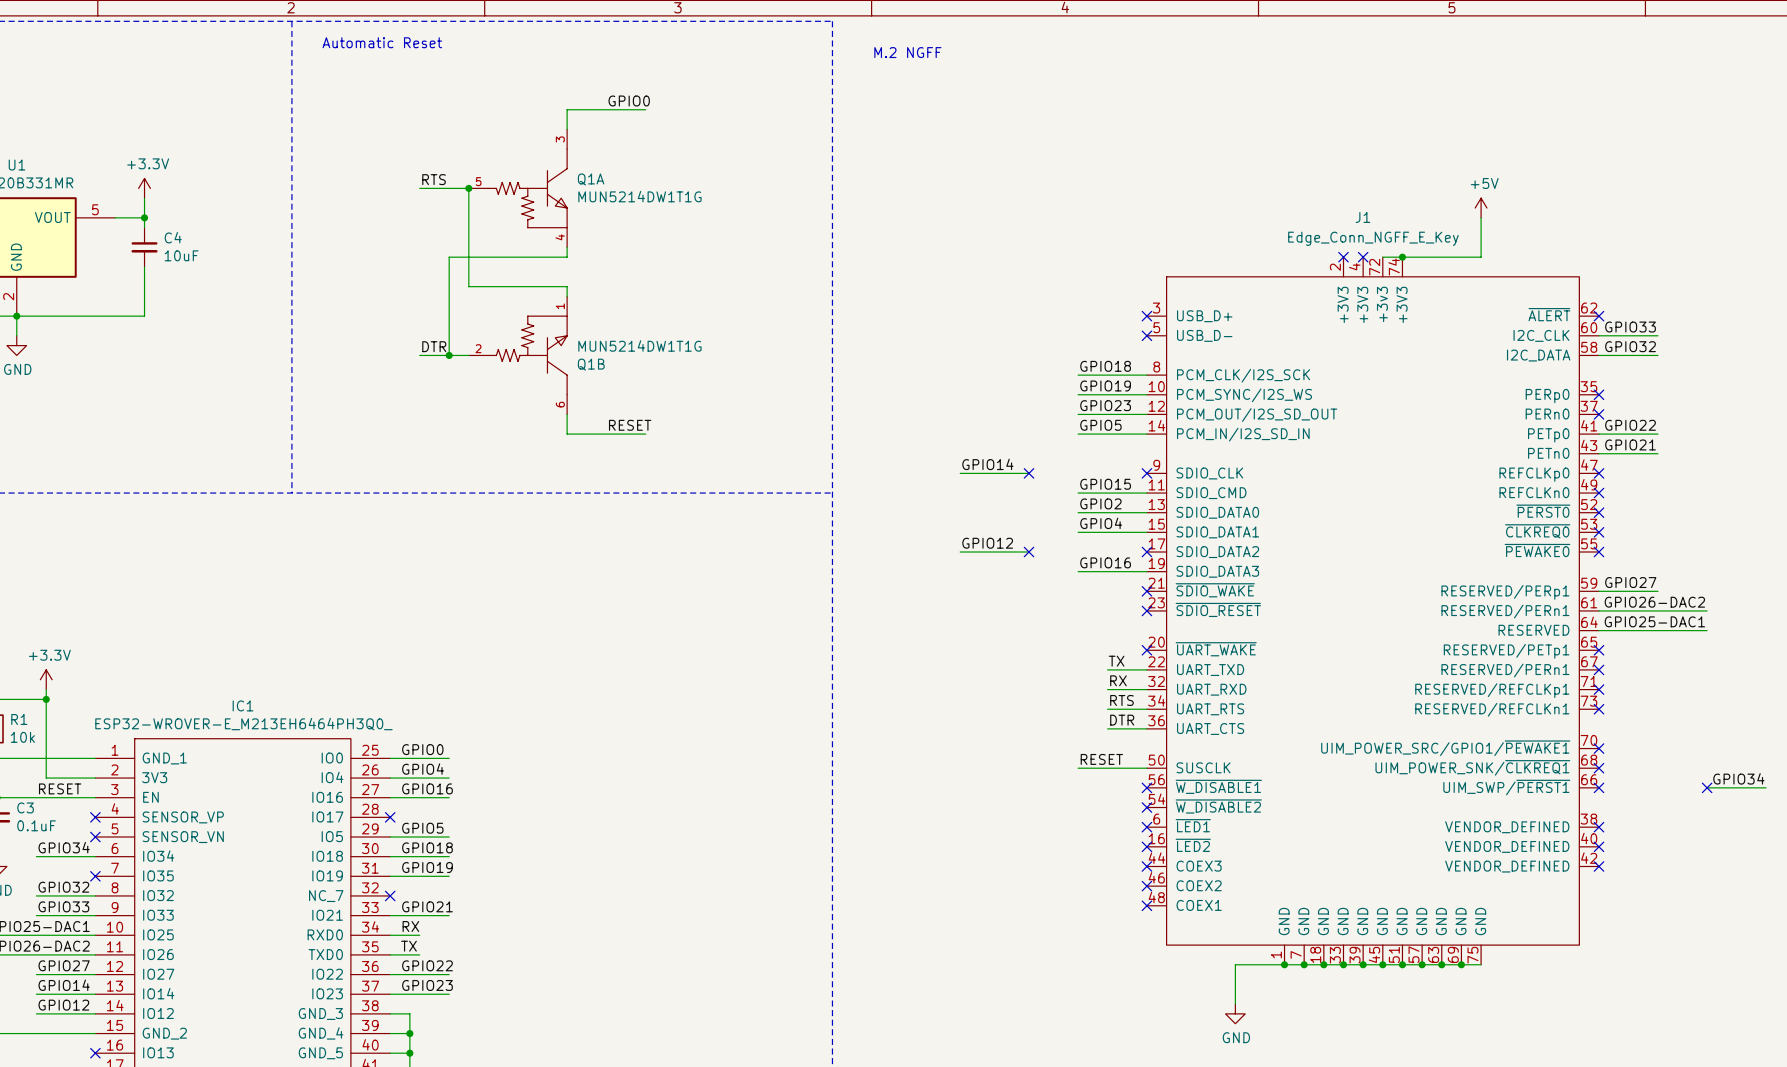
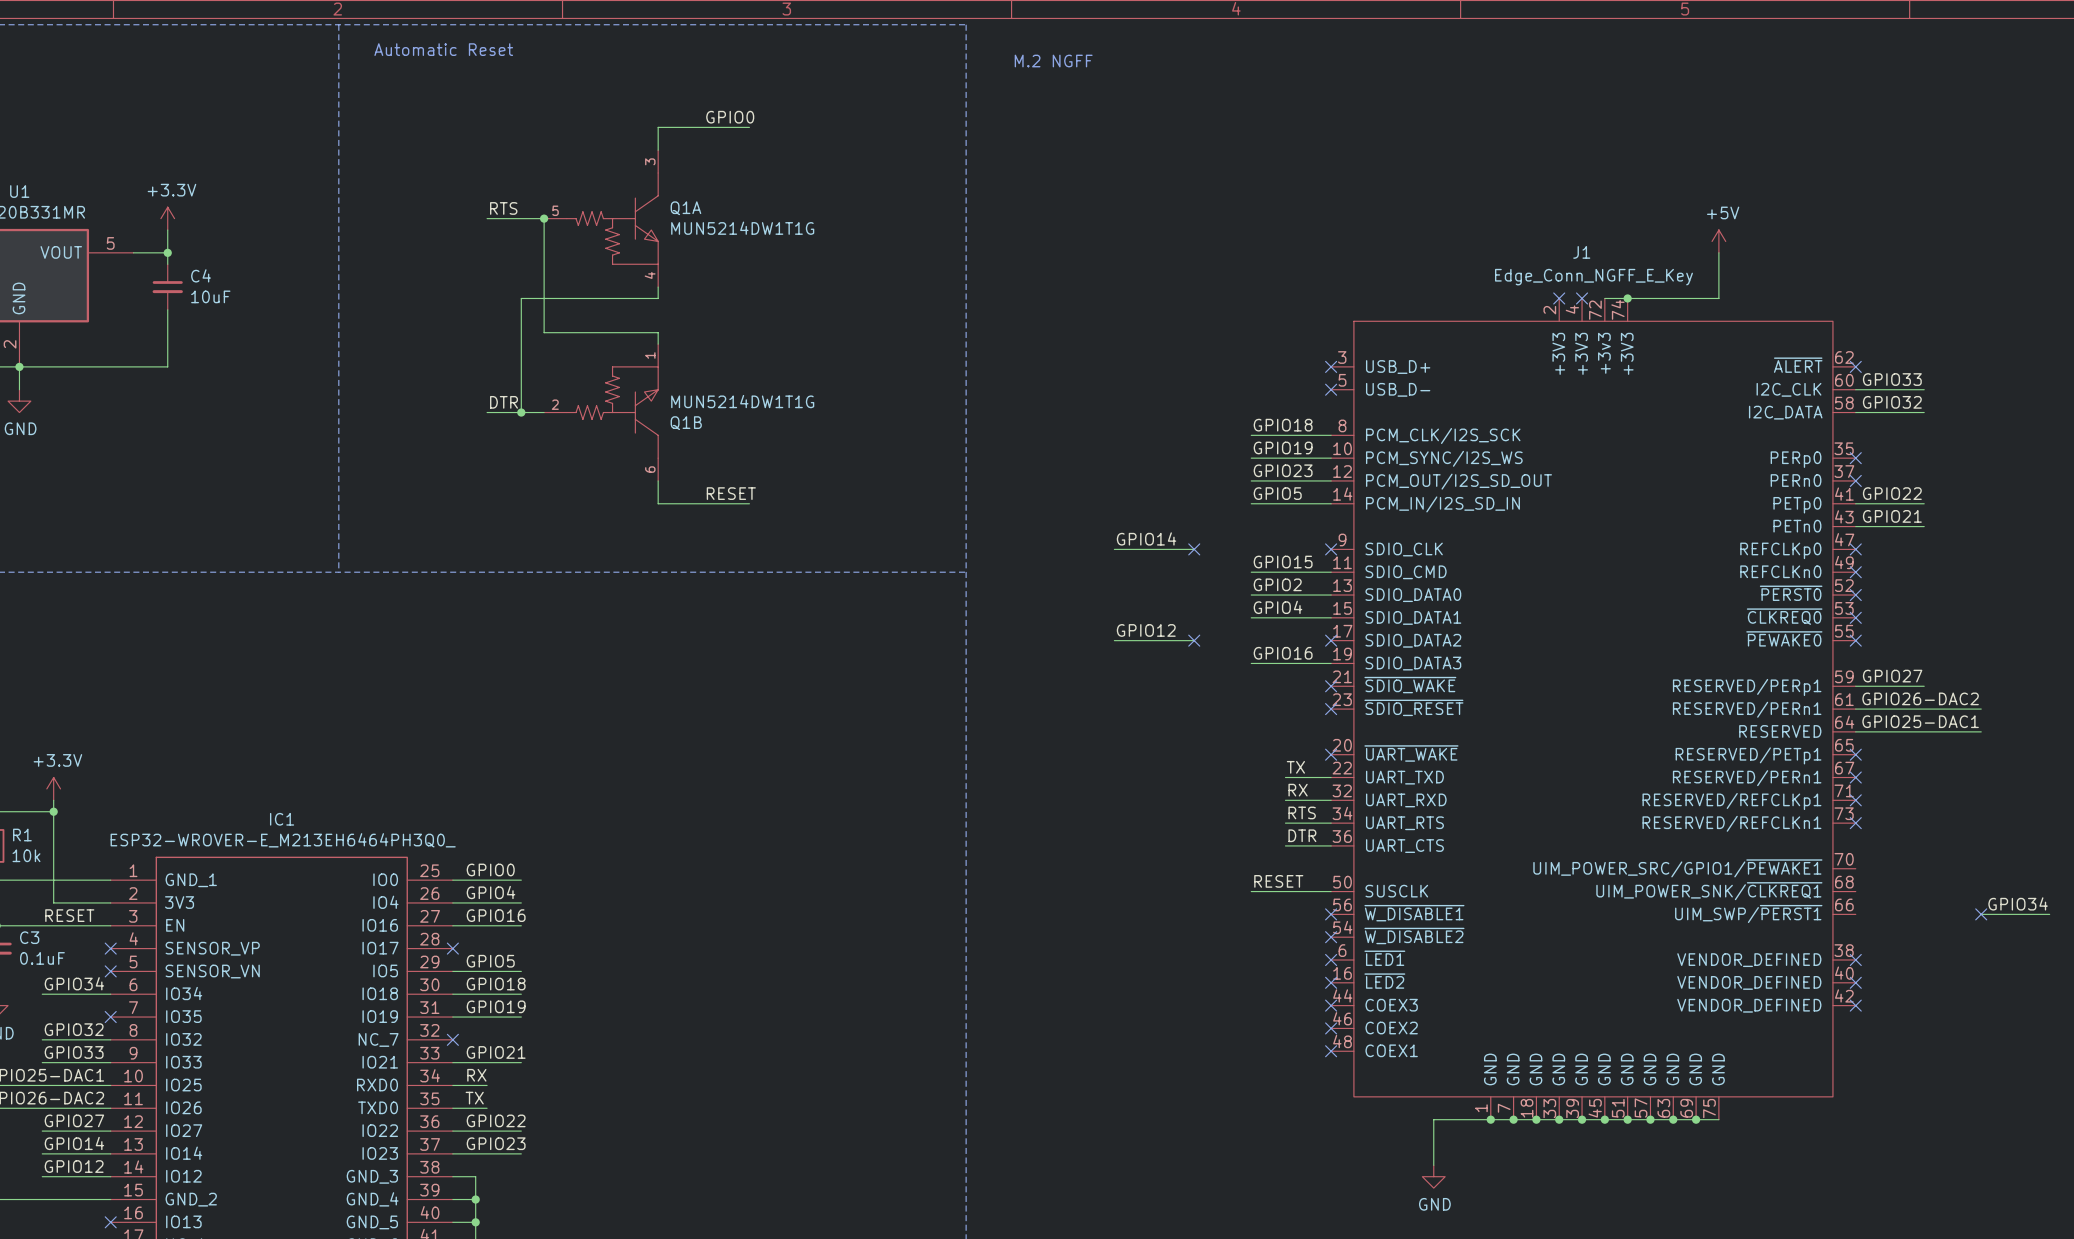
no-connect mark: (1599, 748) -> none
no-connect mark: (1599, 768) -> none
no-connect mark: (1599, 787) -> none

